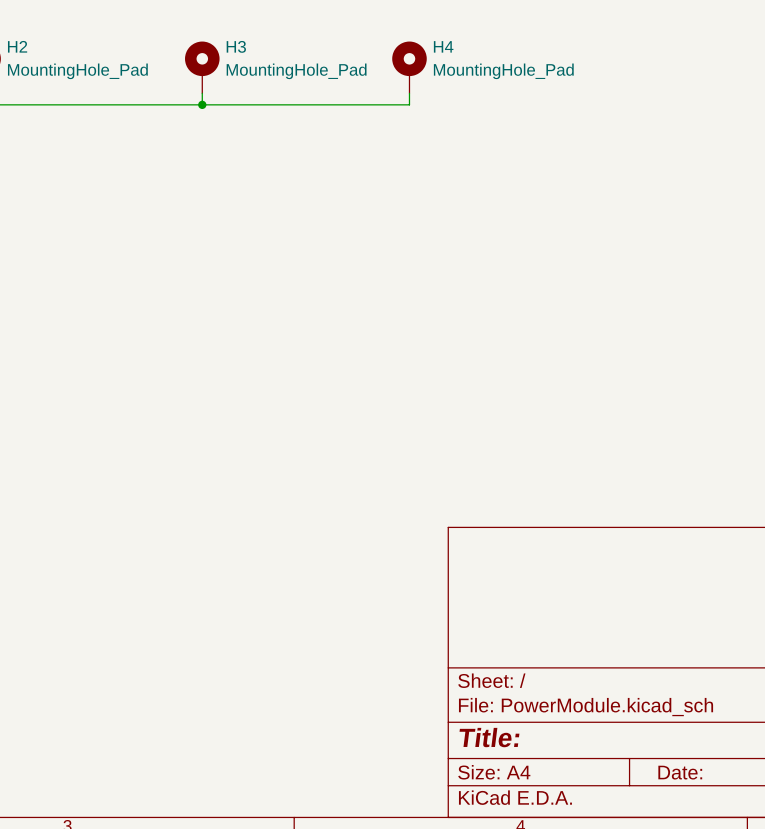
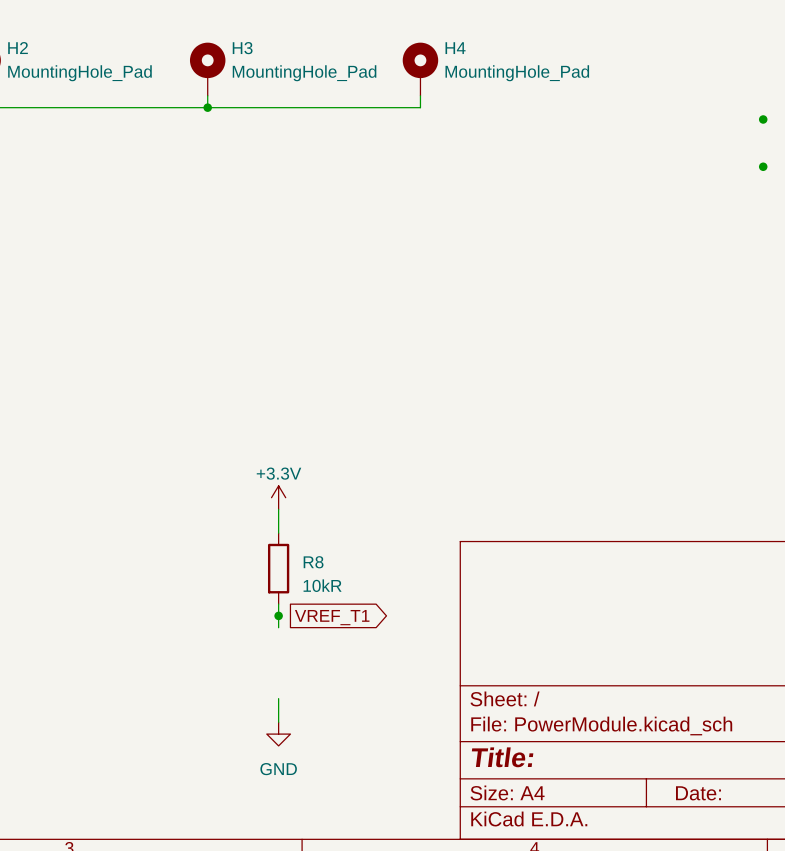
junction: none -> (763, 119)
junction: none -> (763, 166)
power symbol: none -> +3.3V (278, 497)
wire: none -> (278, 509) (278, 533)
R8: none -> 10kR (278, 568)
wire: none -> (278, 604) (278, 627)
junction: none -> (278, 615)
global label: none -> VREF_T1 (332, 617)
wire: none -> (278, 698) (278, 722)
power symbol: none -> GND (278, 734)

